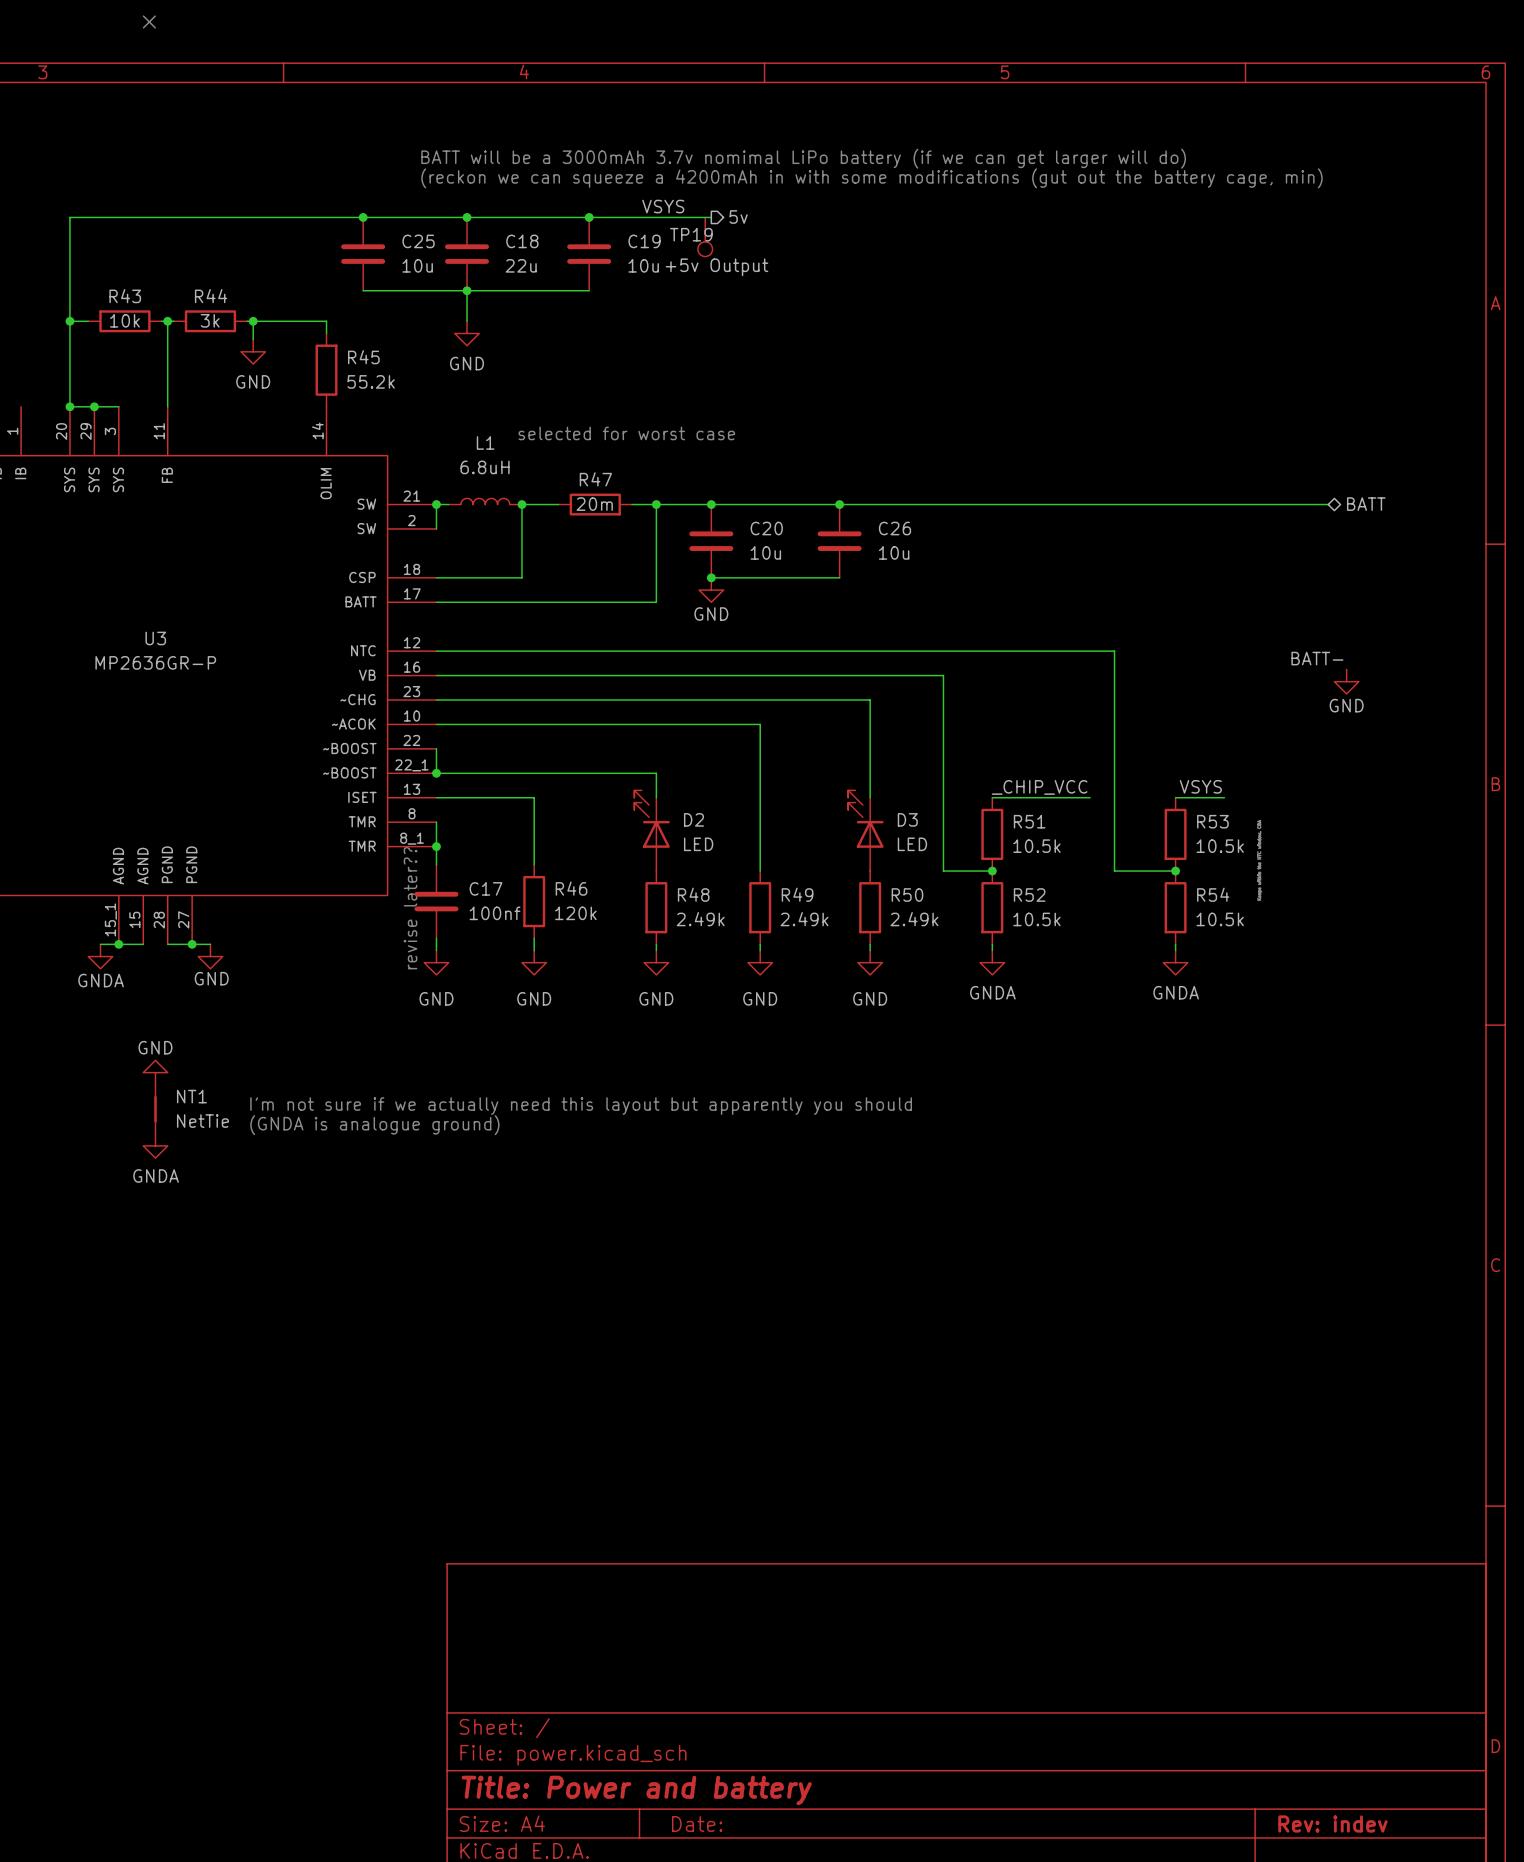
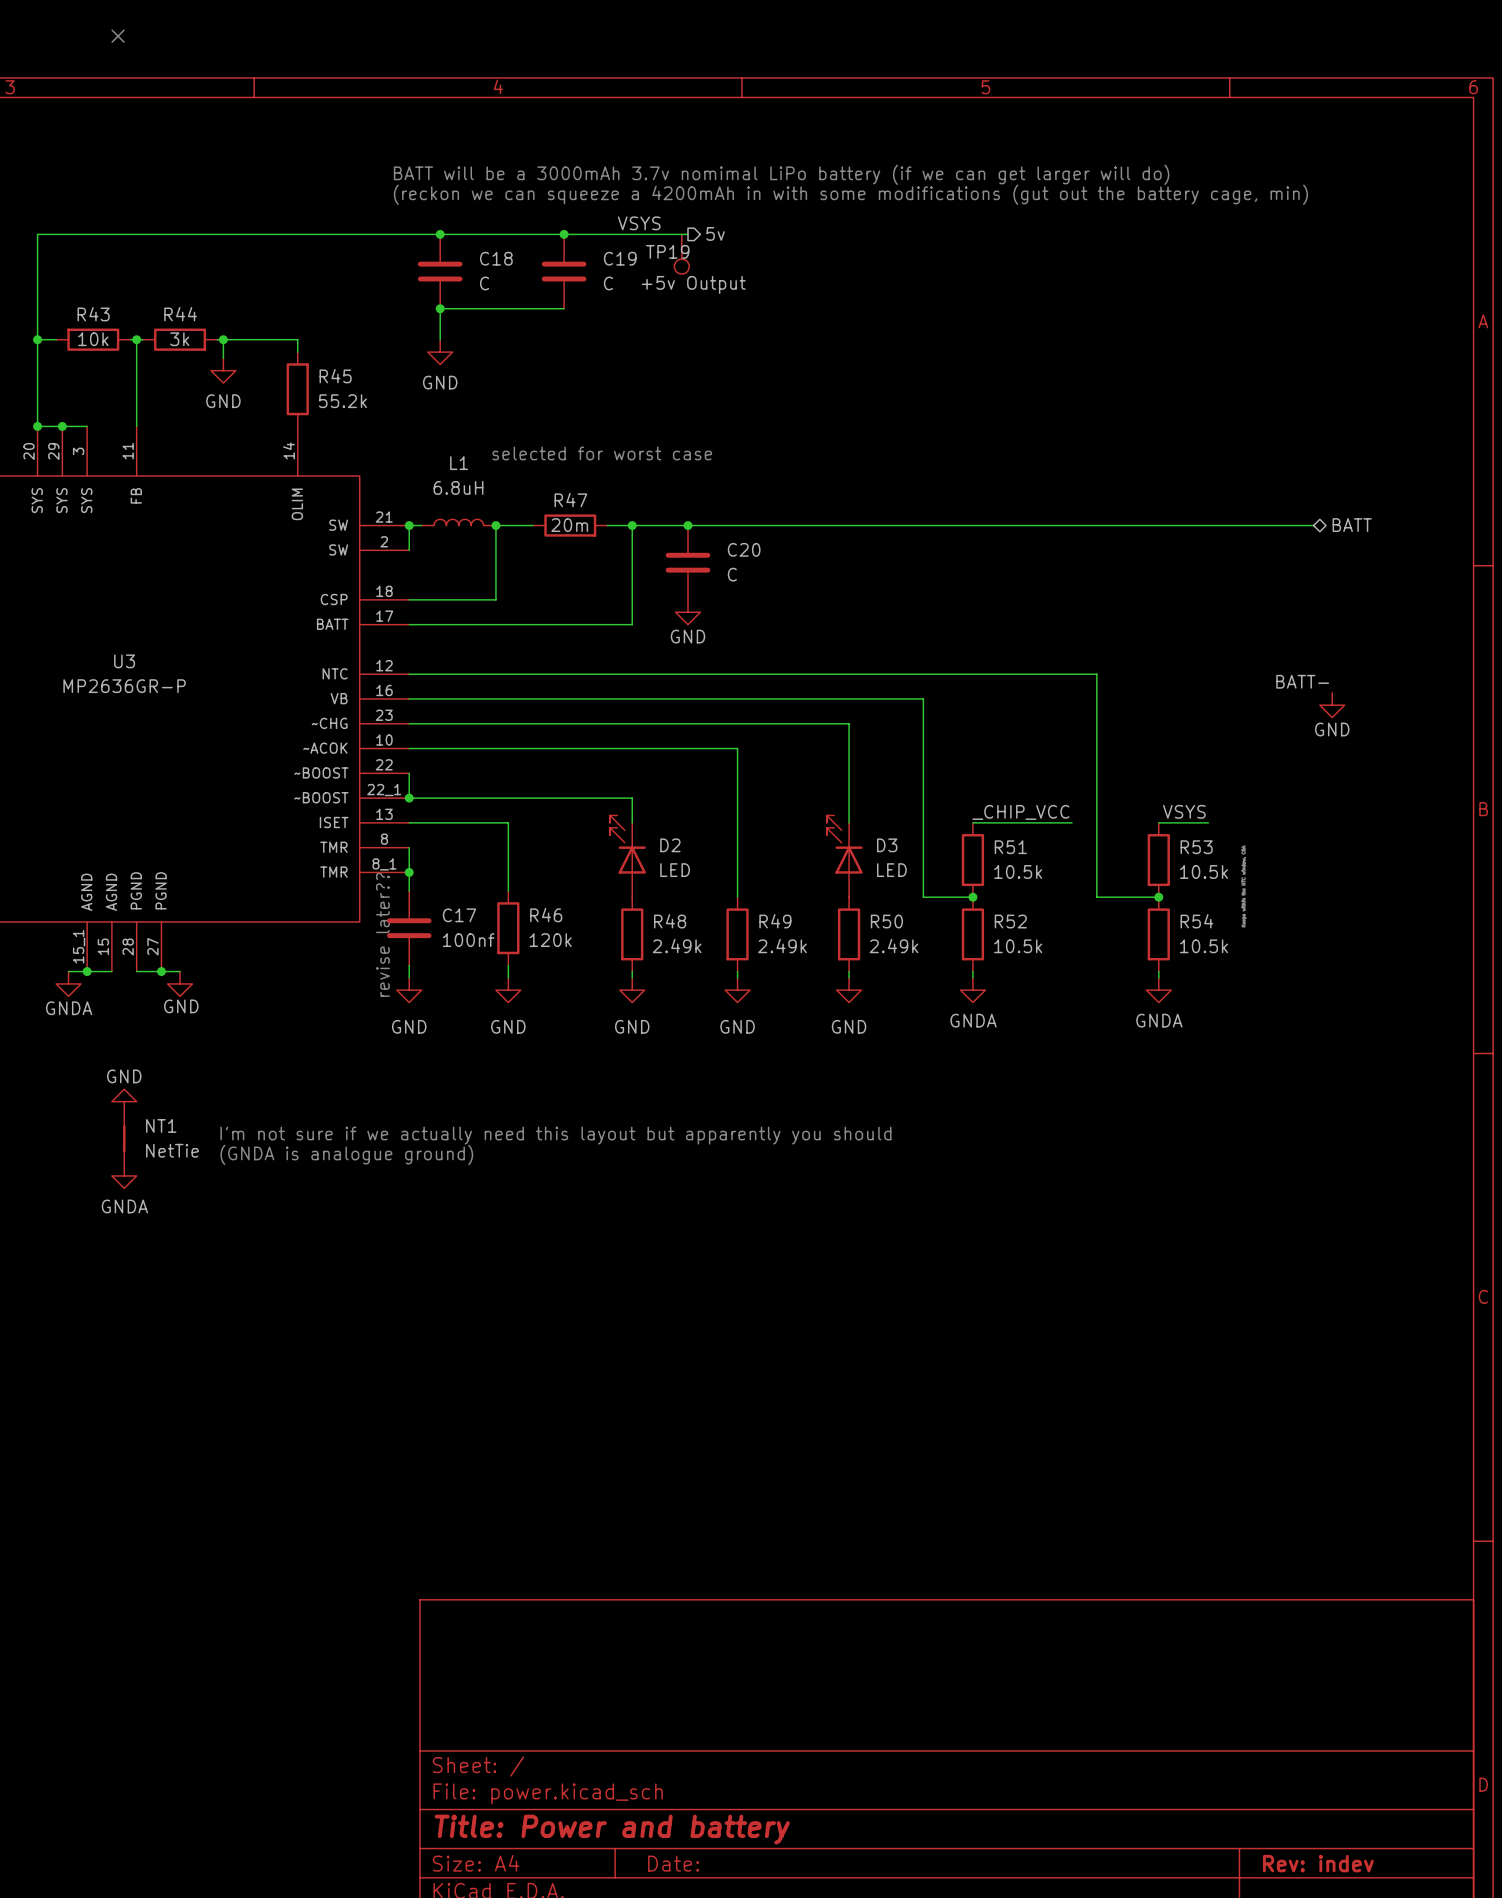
junction: (363, 217) -> none
C25: 10u (363, 254) -> none
C18 value: 22u (521, 265) -> C (484, 283)
C19 value: 10u (643, 265) -> C (608, 283)
wire: (363, 290) (467, 290) -> none
junction: (839, 504) -> none
C26: 10u (839, 541) -> none
C20 value: 10u (765, 552) -> C (732, 574)
wire: (711, 577) (839, 577) -> none
junction: (711, 577) -> none

